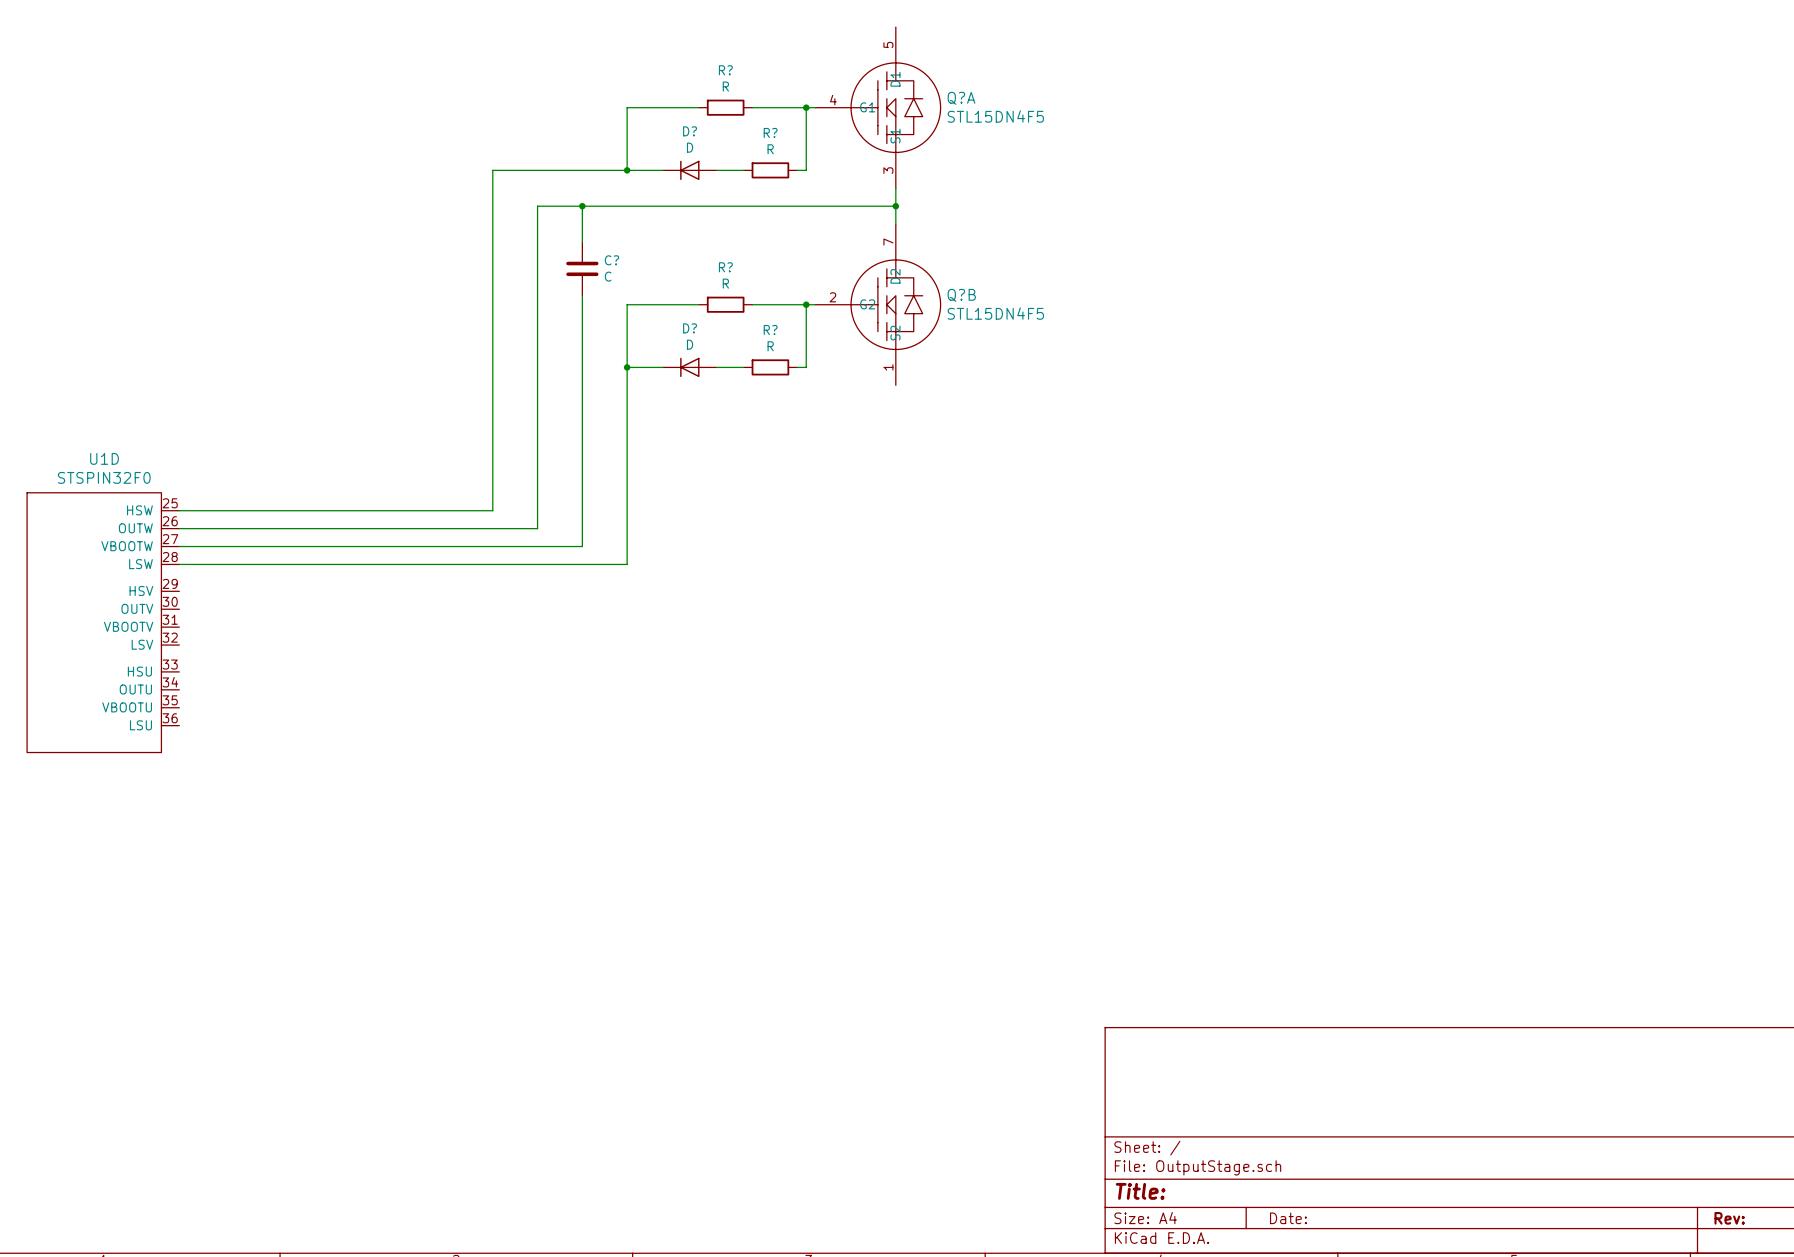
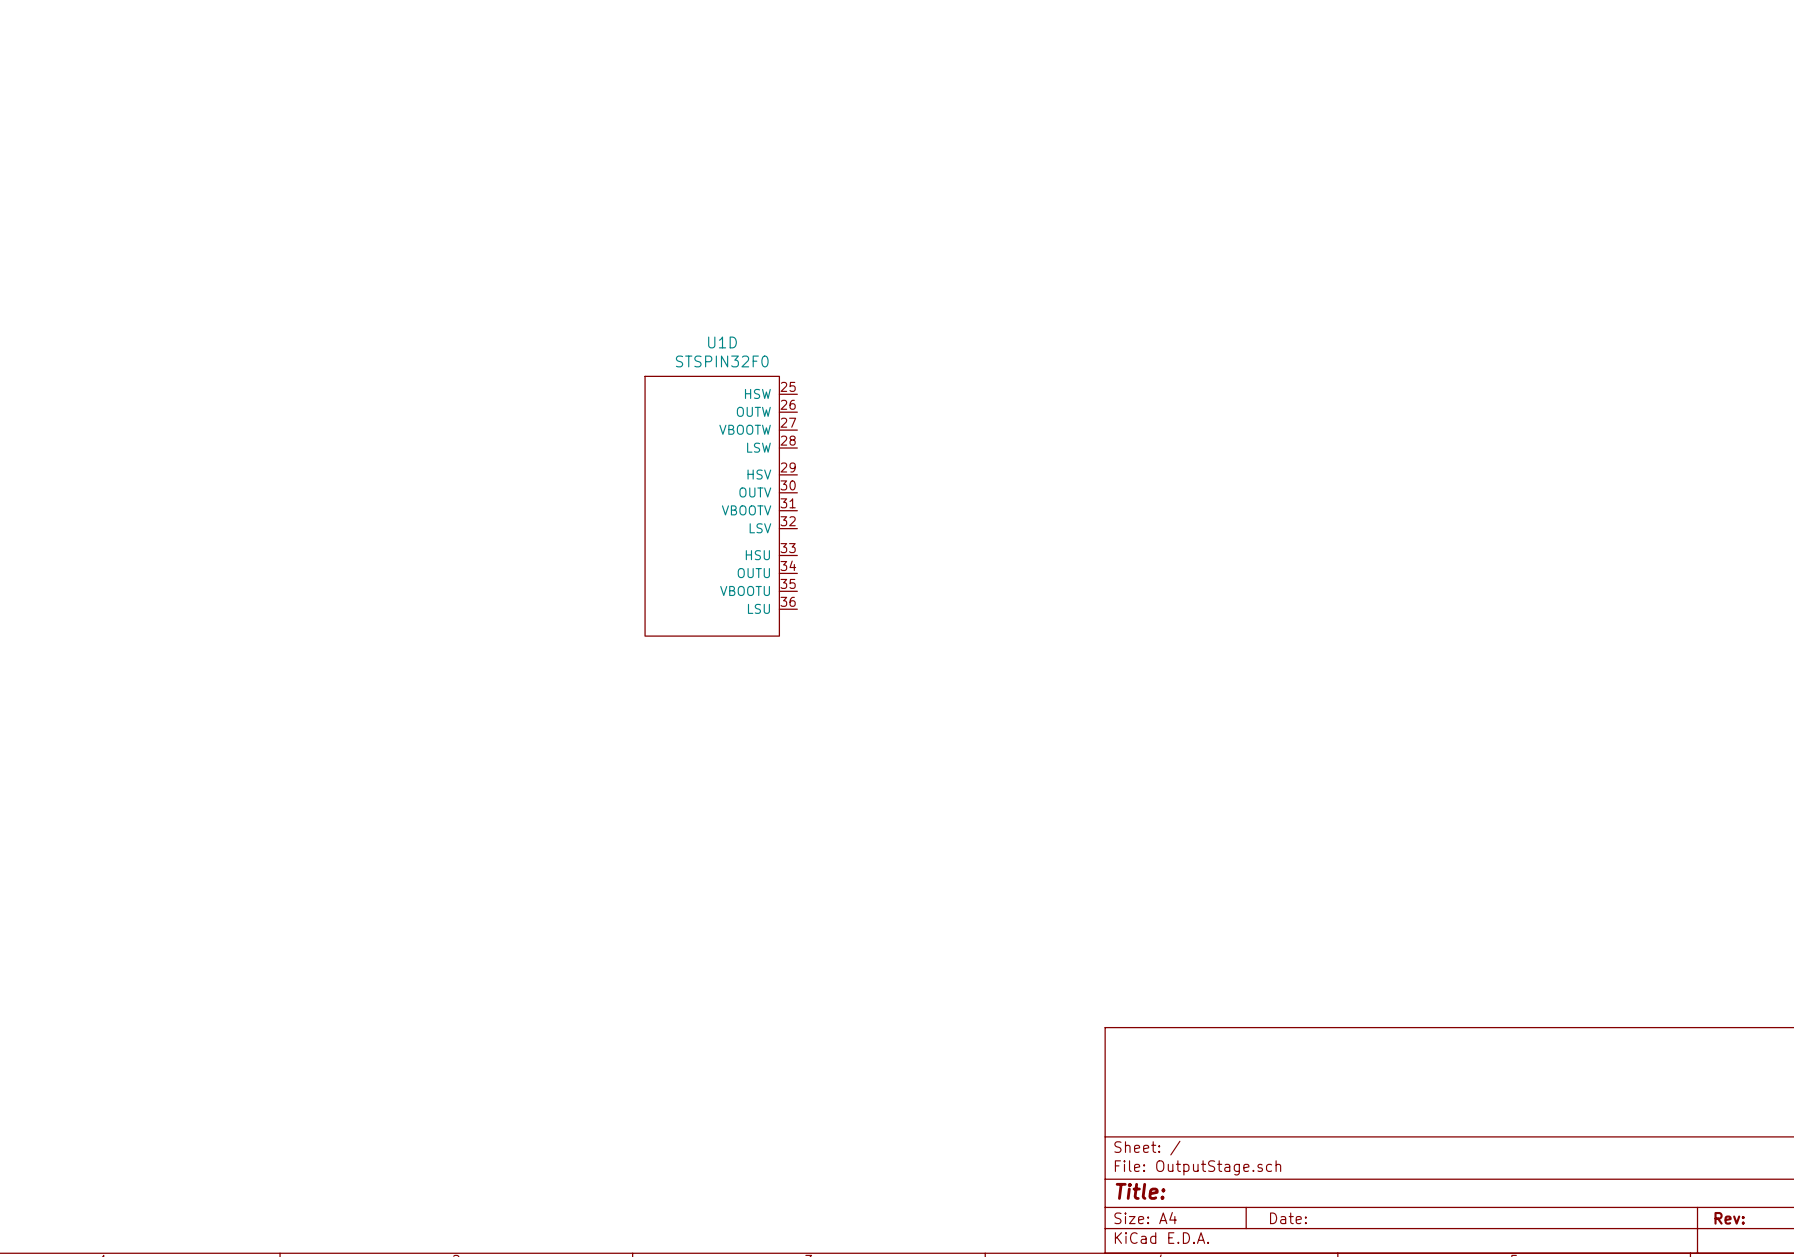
wire: (698, 107) (627, 107) (627, 170) -> none
R?: R (725, 107) -> none
wire: (752, 107) (815, 107) -> none
wire: (806, 107) (806, 170) (797, 170) -> none
junction: (806, 107) -> none
Q?A: STL15DN4F5 (877, 107) -> none
junction: (627, 170) -> none
wire: (662, 170) (492, 170) (492, 510) (179, 510) -> none
D?: D (689, 170) -> none
wire: (716, 170) (743, 170) -> none
R?: R (770, 170) -> none
wire: (895, 188) (895, 224) -> none
wire: (582, 206) (582, 242) -> none
junction: (582, 206) -> none
wire: (895, 206) (537, 206) (537, 528) (179, 528) -> none
junction: (895, 206) -> none
C?: C (582, 268) -> none
wire: (582, 295) (582, 546) (179, 546) -> none
wire: (698, 304) (627, 304) (627, 564) (179, 564) -> none
R?: R (725, 304) -> none
wire: (752, 304) (815, 304) -> none
wire: (806, 304) (806, 367) (797, 367) -> none
junction: (806, 304) -> none
Q?B: STL15DN4F5 (877, 304) -> none
wire: (627, 367) (662, 367) -> none
junction: (627, 367) -> none
D?: D (689, 367) -> none
wire: (716, 367) (743, 367) -> none
R?: R (770, 367) -> none
U1D position: (103, 622) -> (721, 506)

